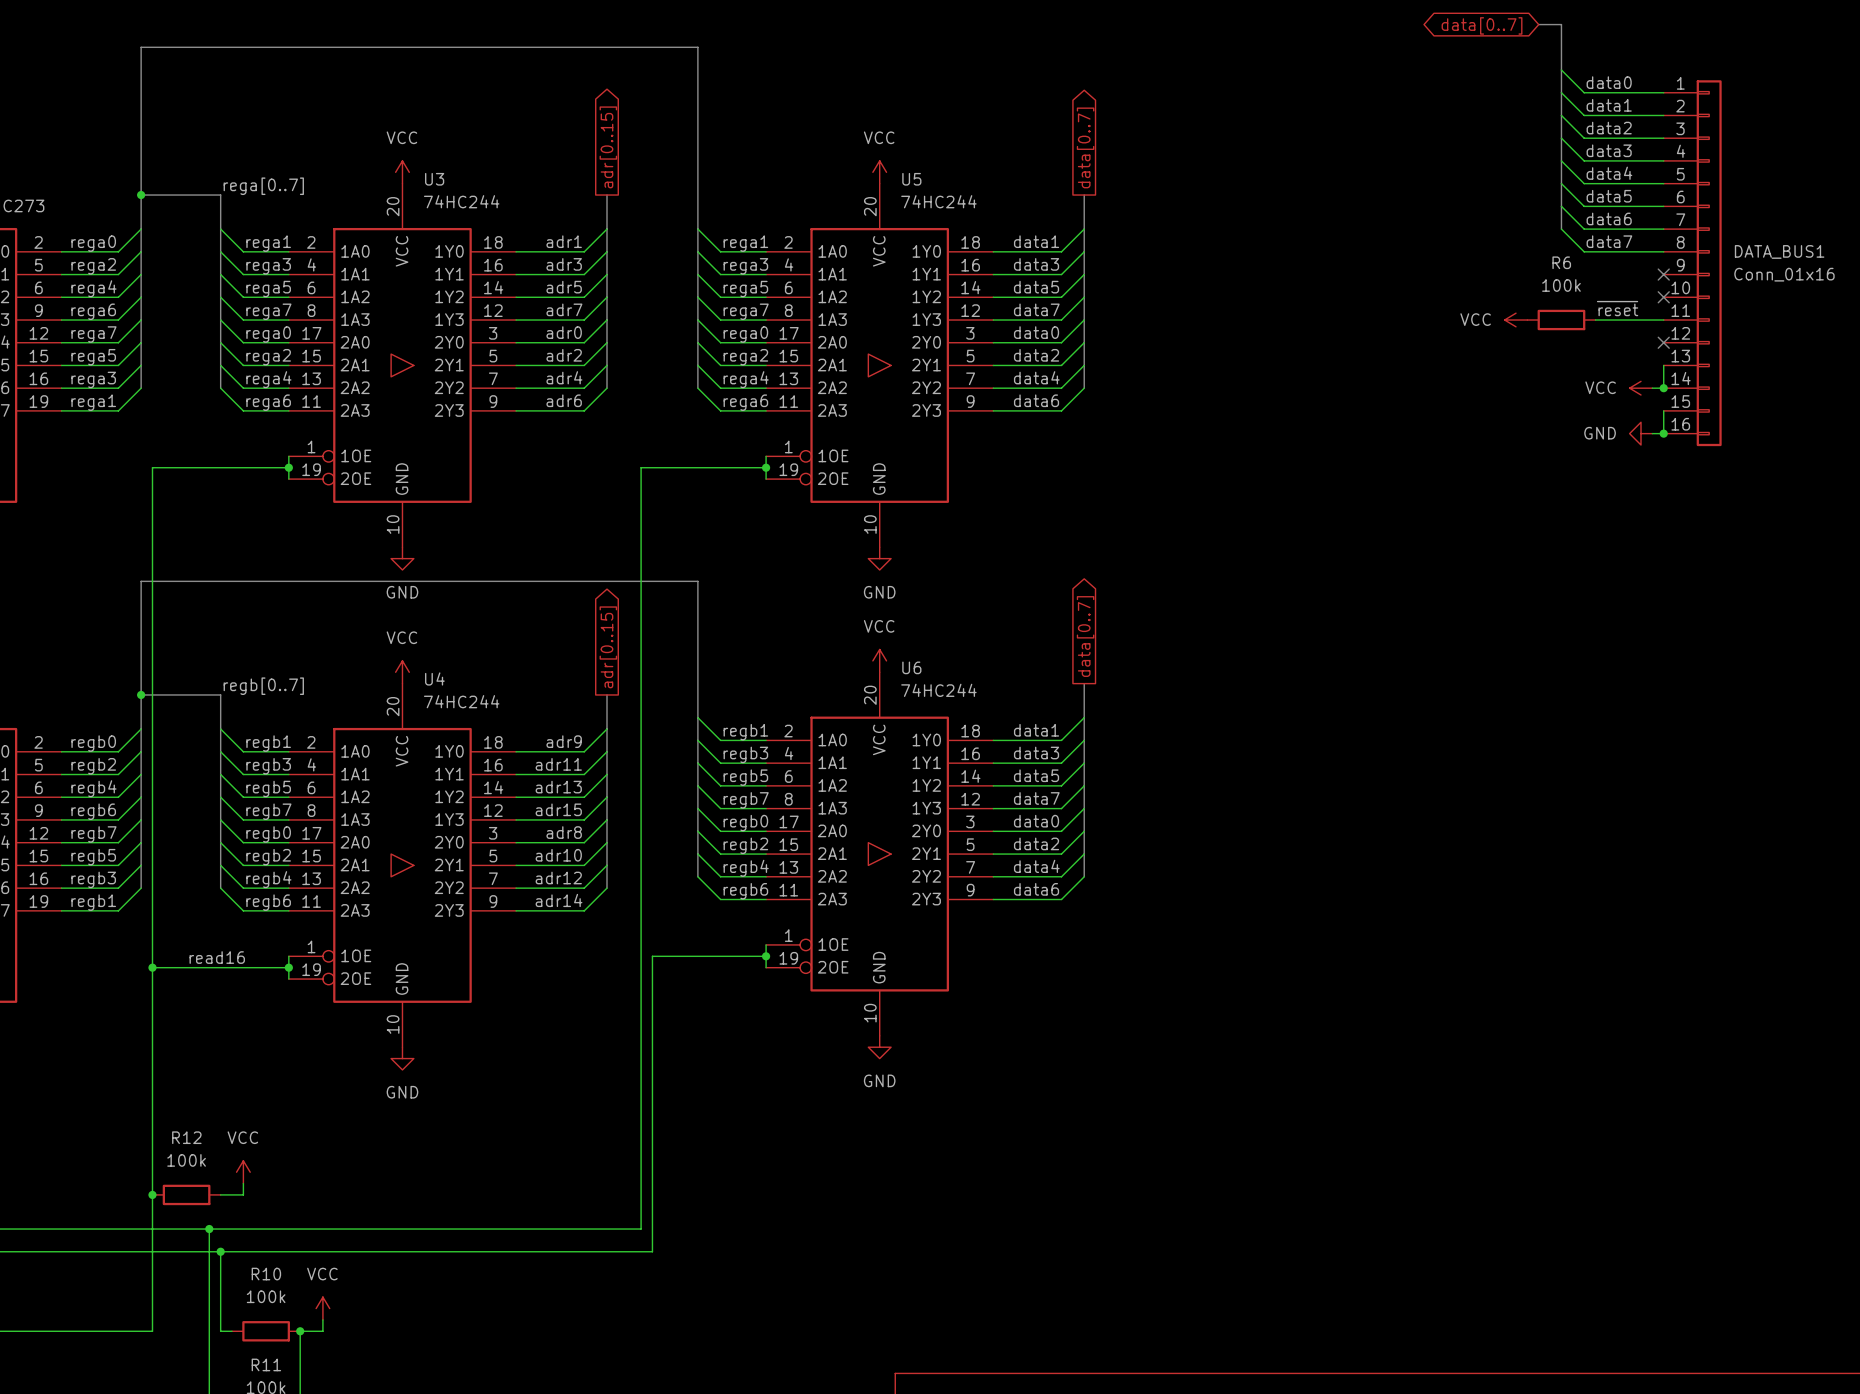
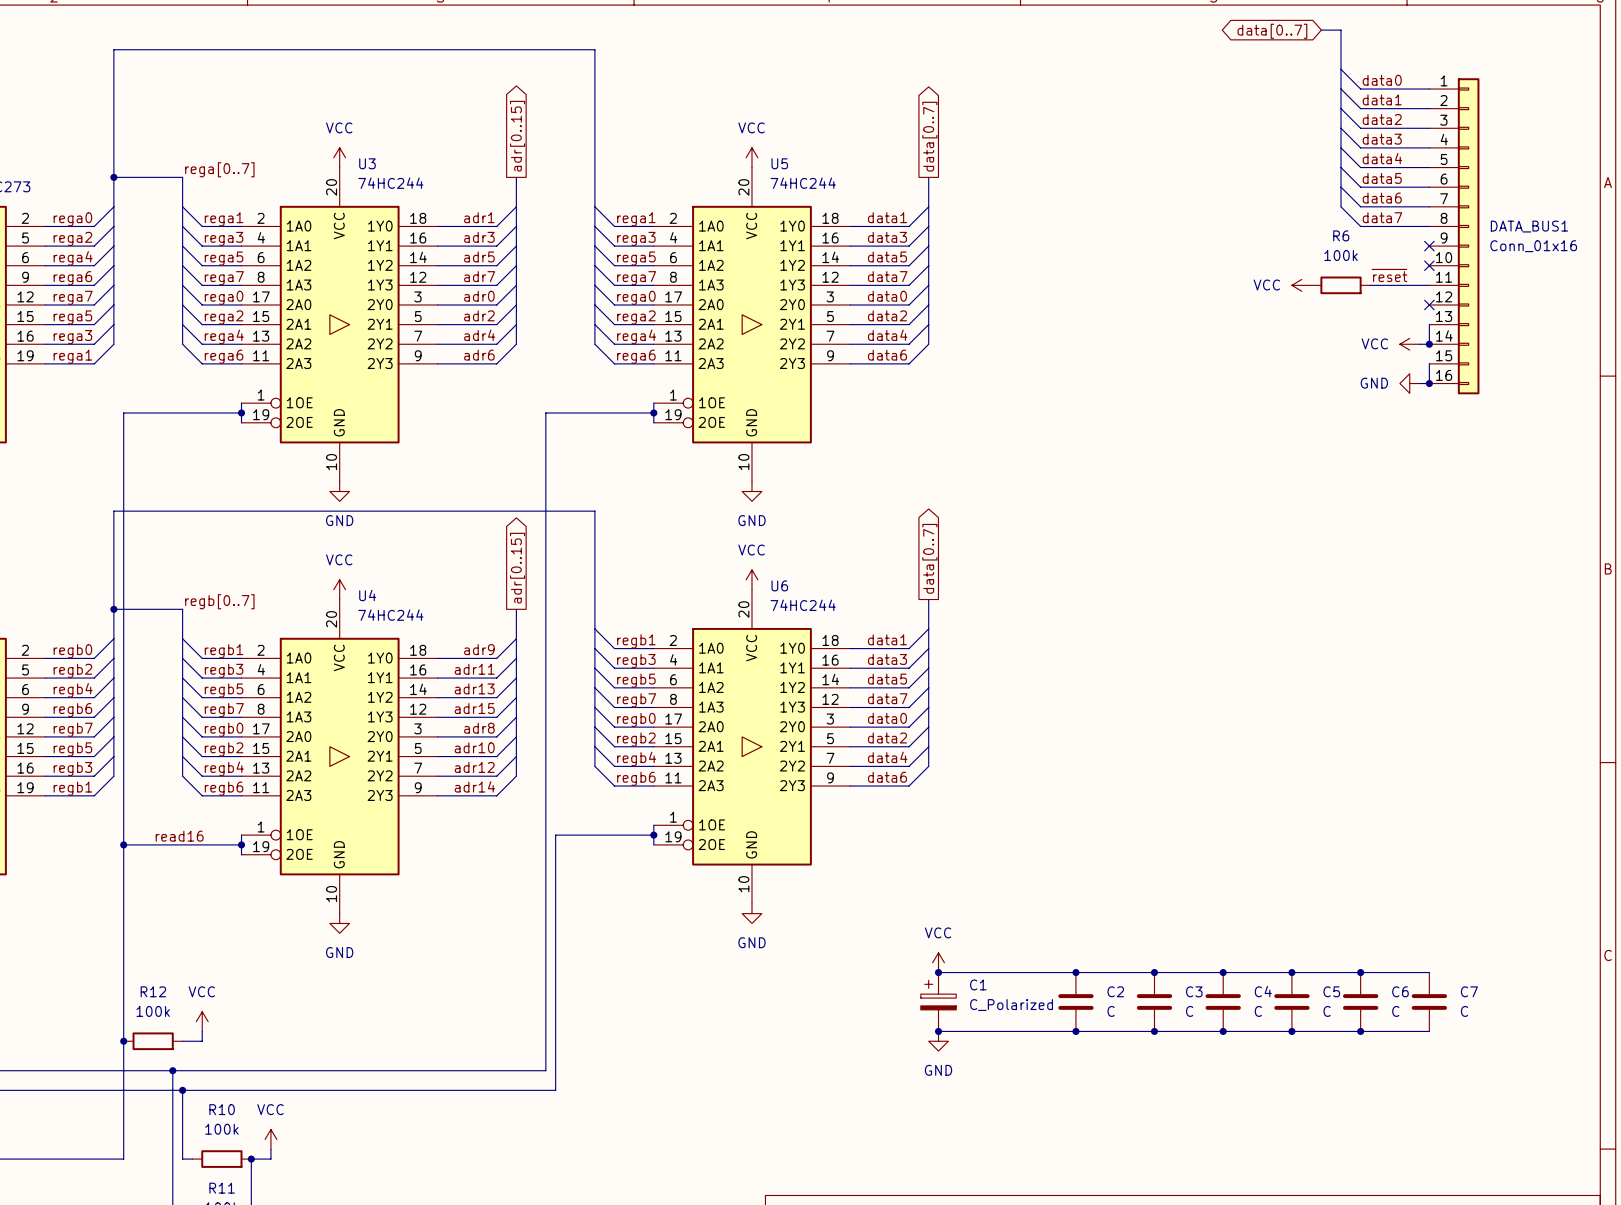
power symbol: none -> VCC (938, 962)
wire: none -> (938, 972) (1429, 972)
junction: none -> (938, 972)
junction: none -> (1075, 972)
junction: none -> (1154, 972)
junction: none -> (1223, 972)
junction: none -> (1291, 972)
junction: none -> (1360, 972)
C1: none -> C_Polarized (938, 1002)
C2: none -> C (1075, 1002)
C3: none -> C (1154, 1002)
C4: none -> C (1223, 1002)
C5: none -> C (1291, 1002)
C6: none -> C (1360, 1002)
C7: none -> C (1429, 1002)
wire: none -> (938, 1031) (1429, 1031)
junction: none -> (938, 1031)
junction: none -> (1075, 1031)
junction: none -> (1154, 1031)
junction: none -> (1223, 1031)
junction: none -> (1291, 1031)
junction: none -> (1360, 1031)
power symbol: none -> GND (938, 1041)

